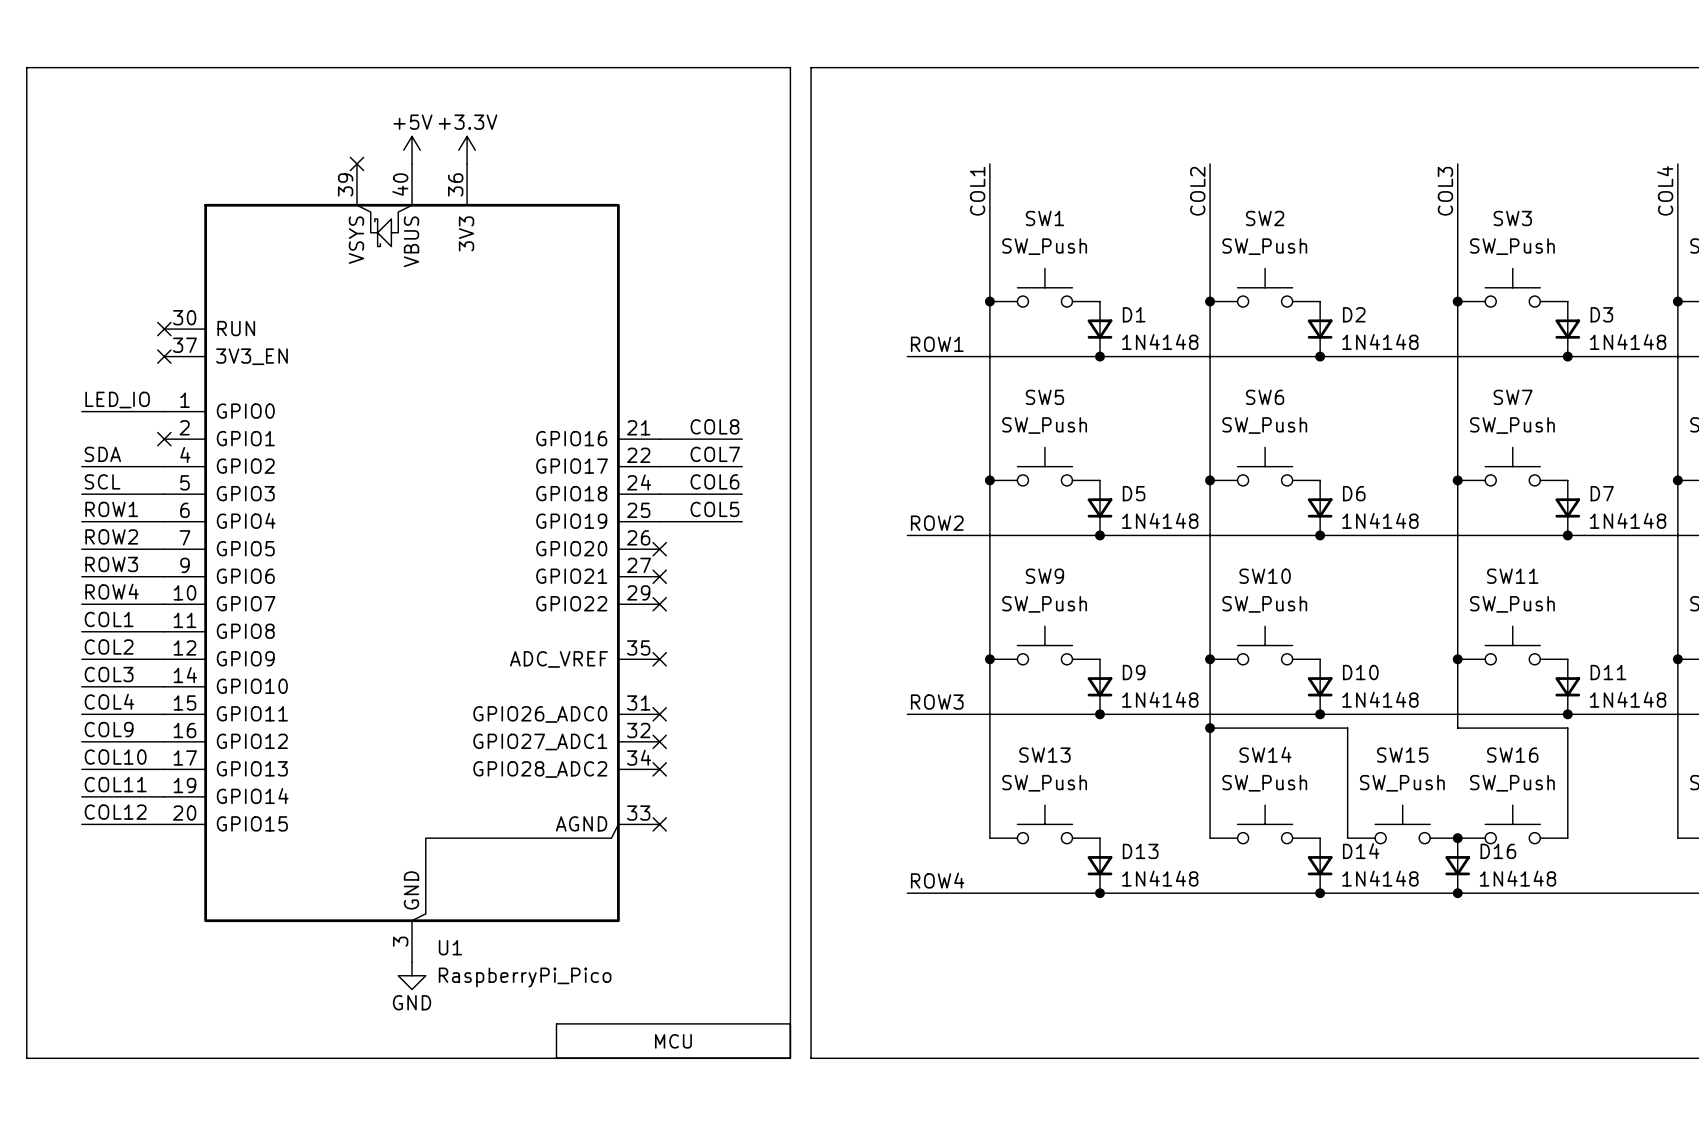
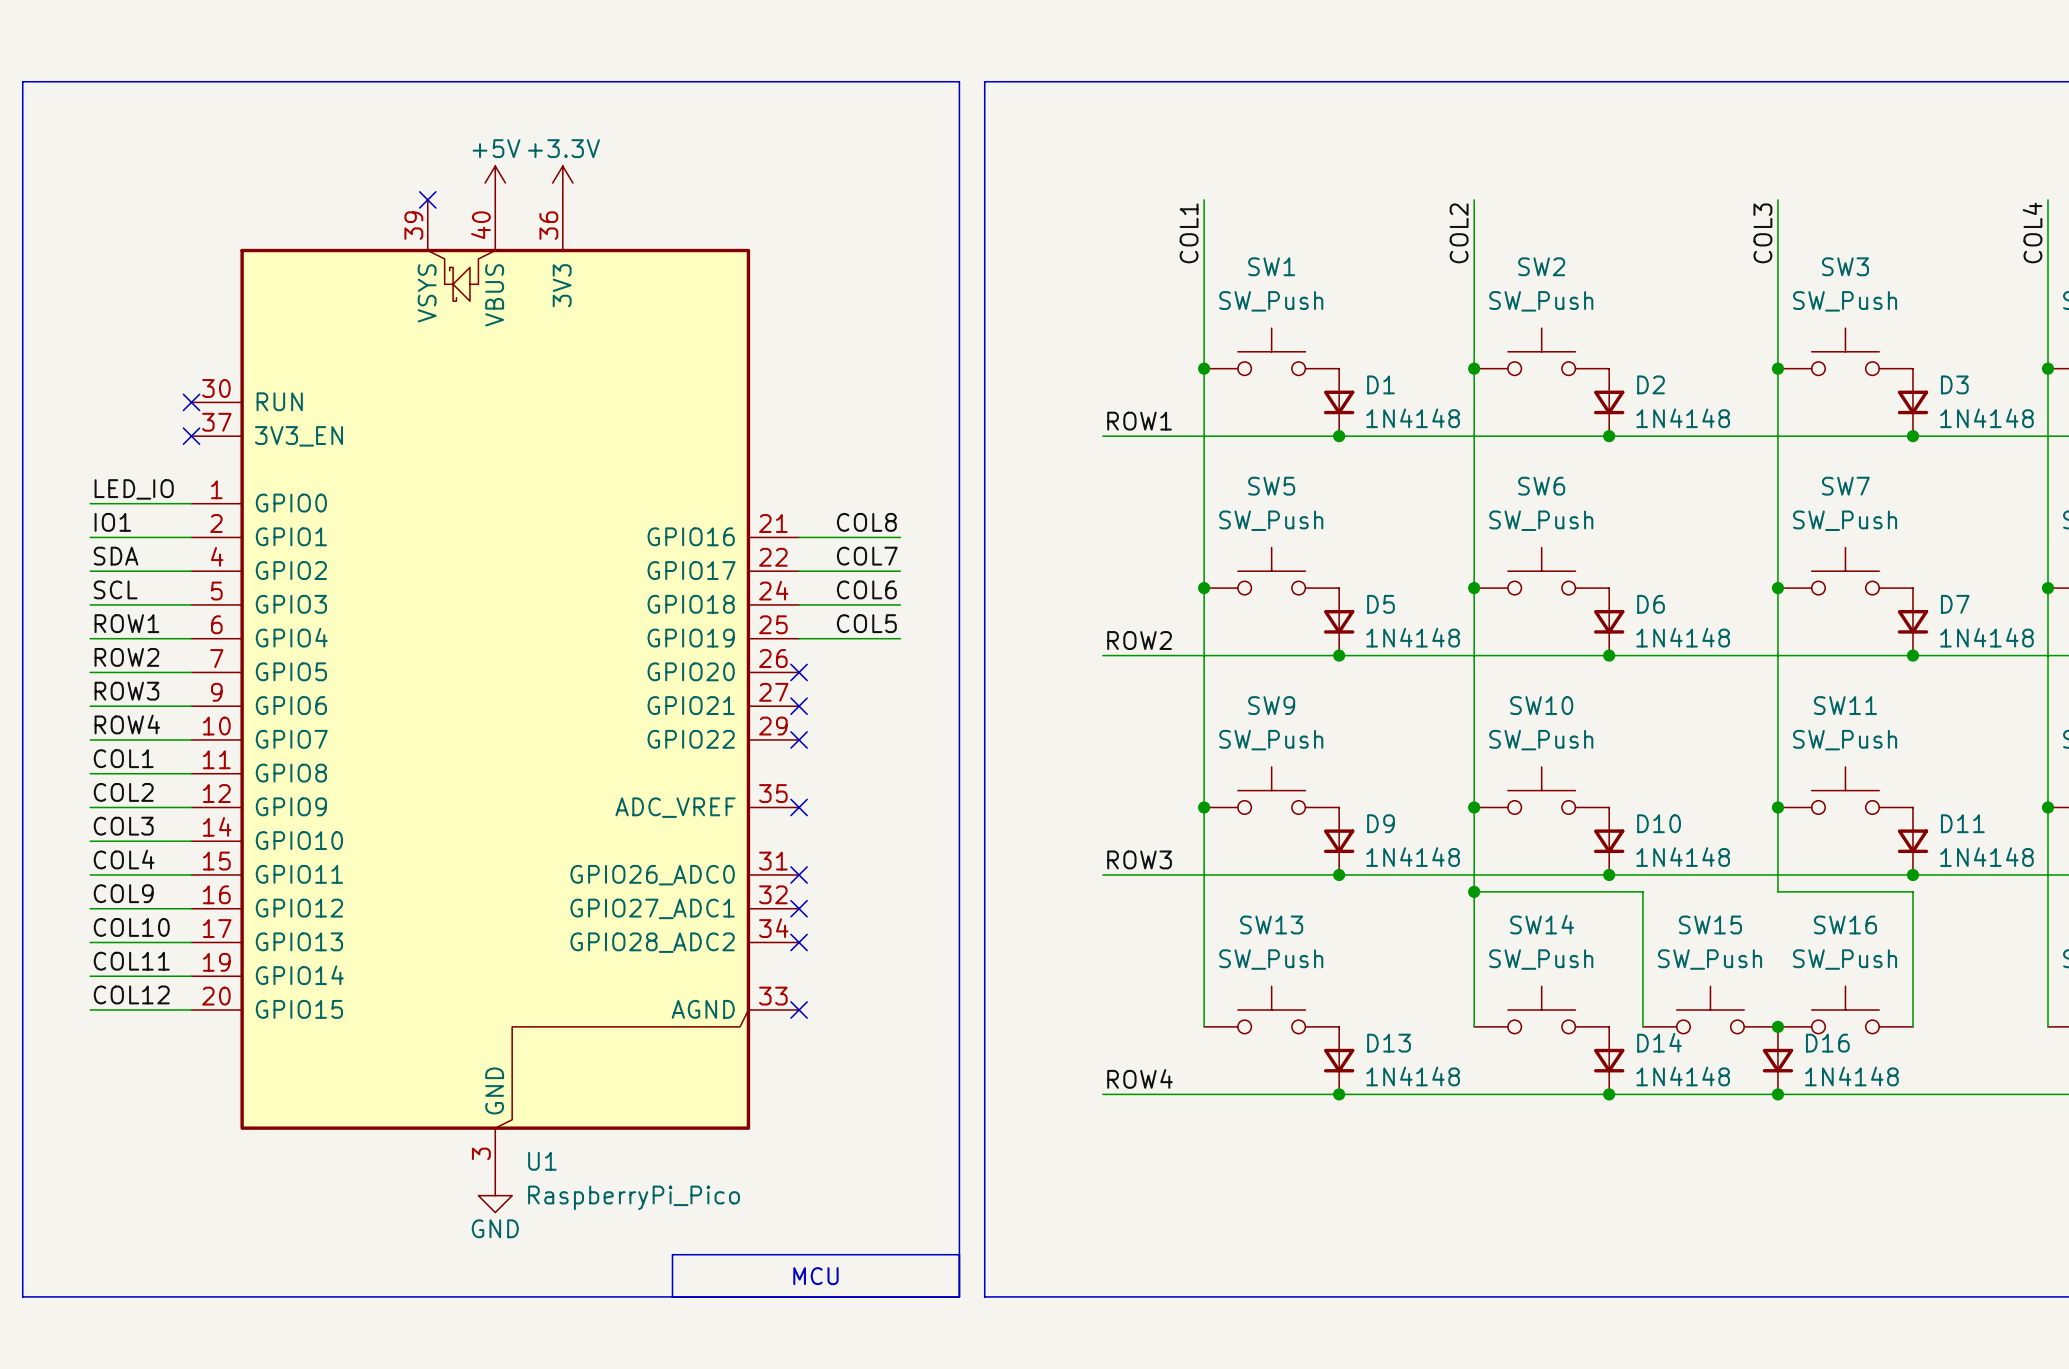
label: none -> IO1 (112, 522)
wire: none -> (90, 537) (191, 537)
no-connect mark: (164, 439) -> none

